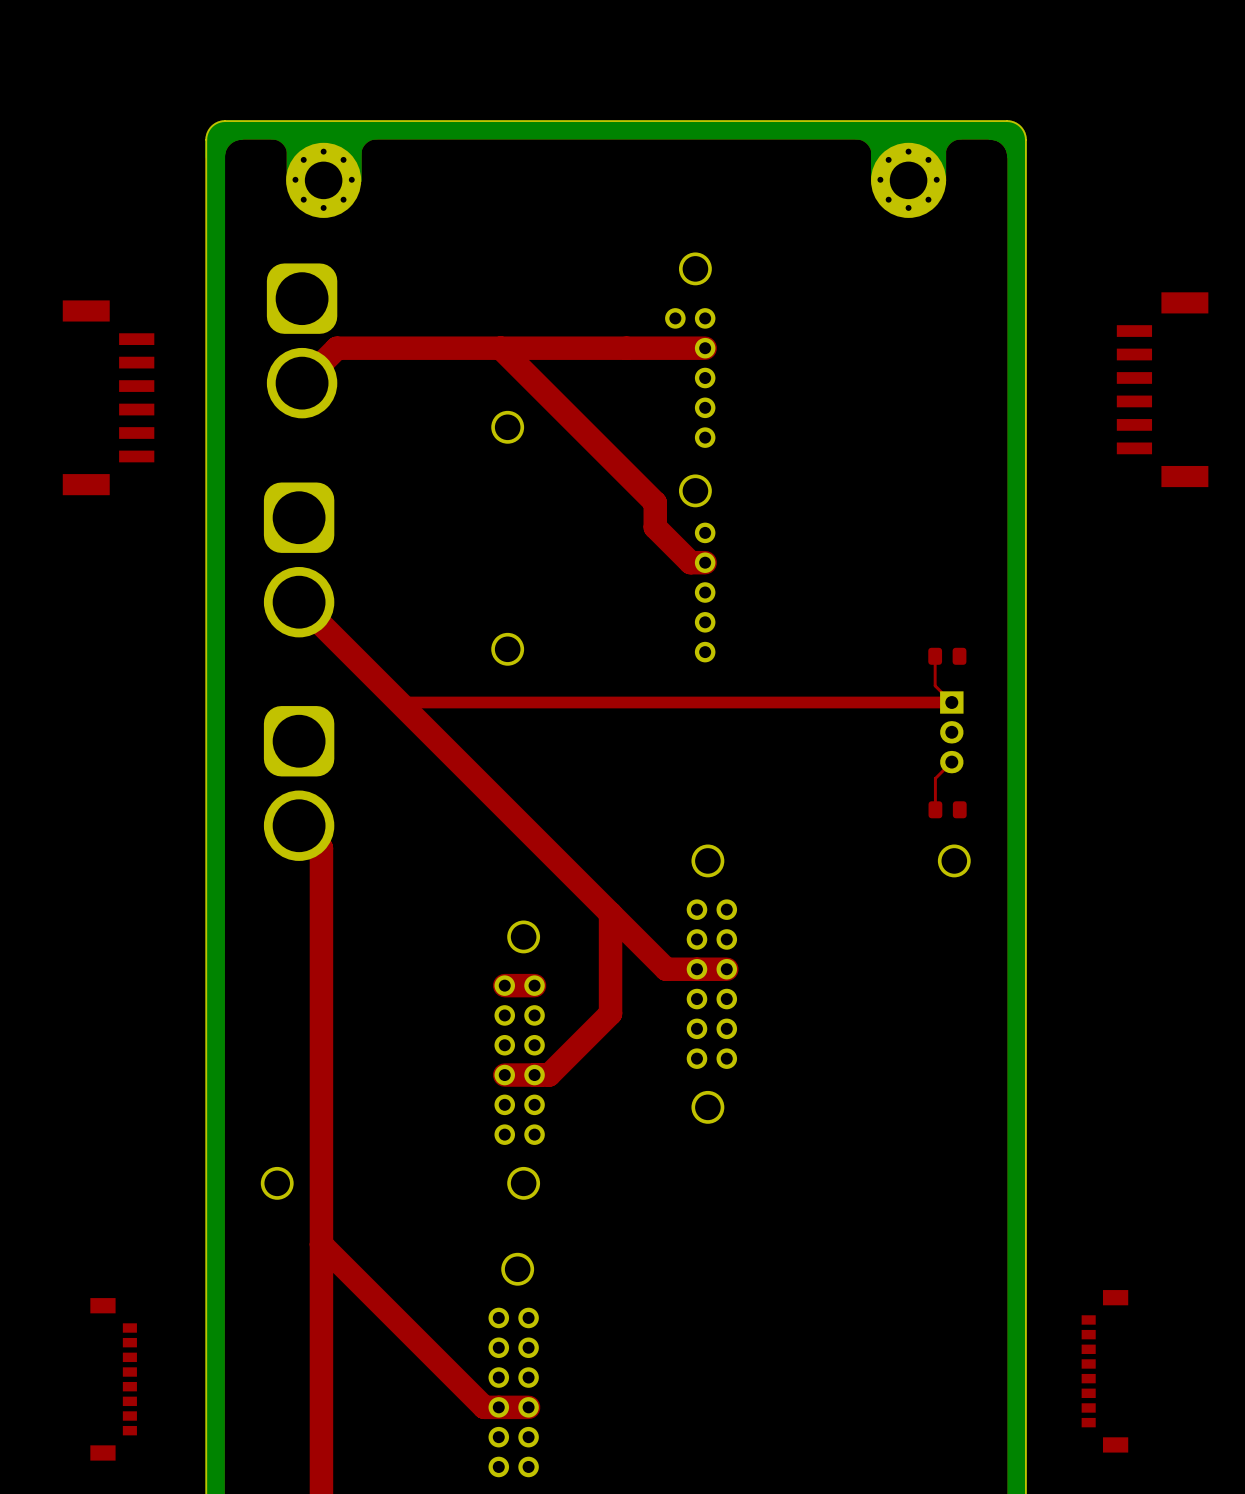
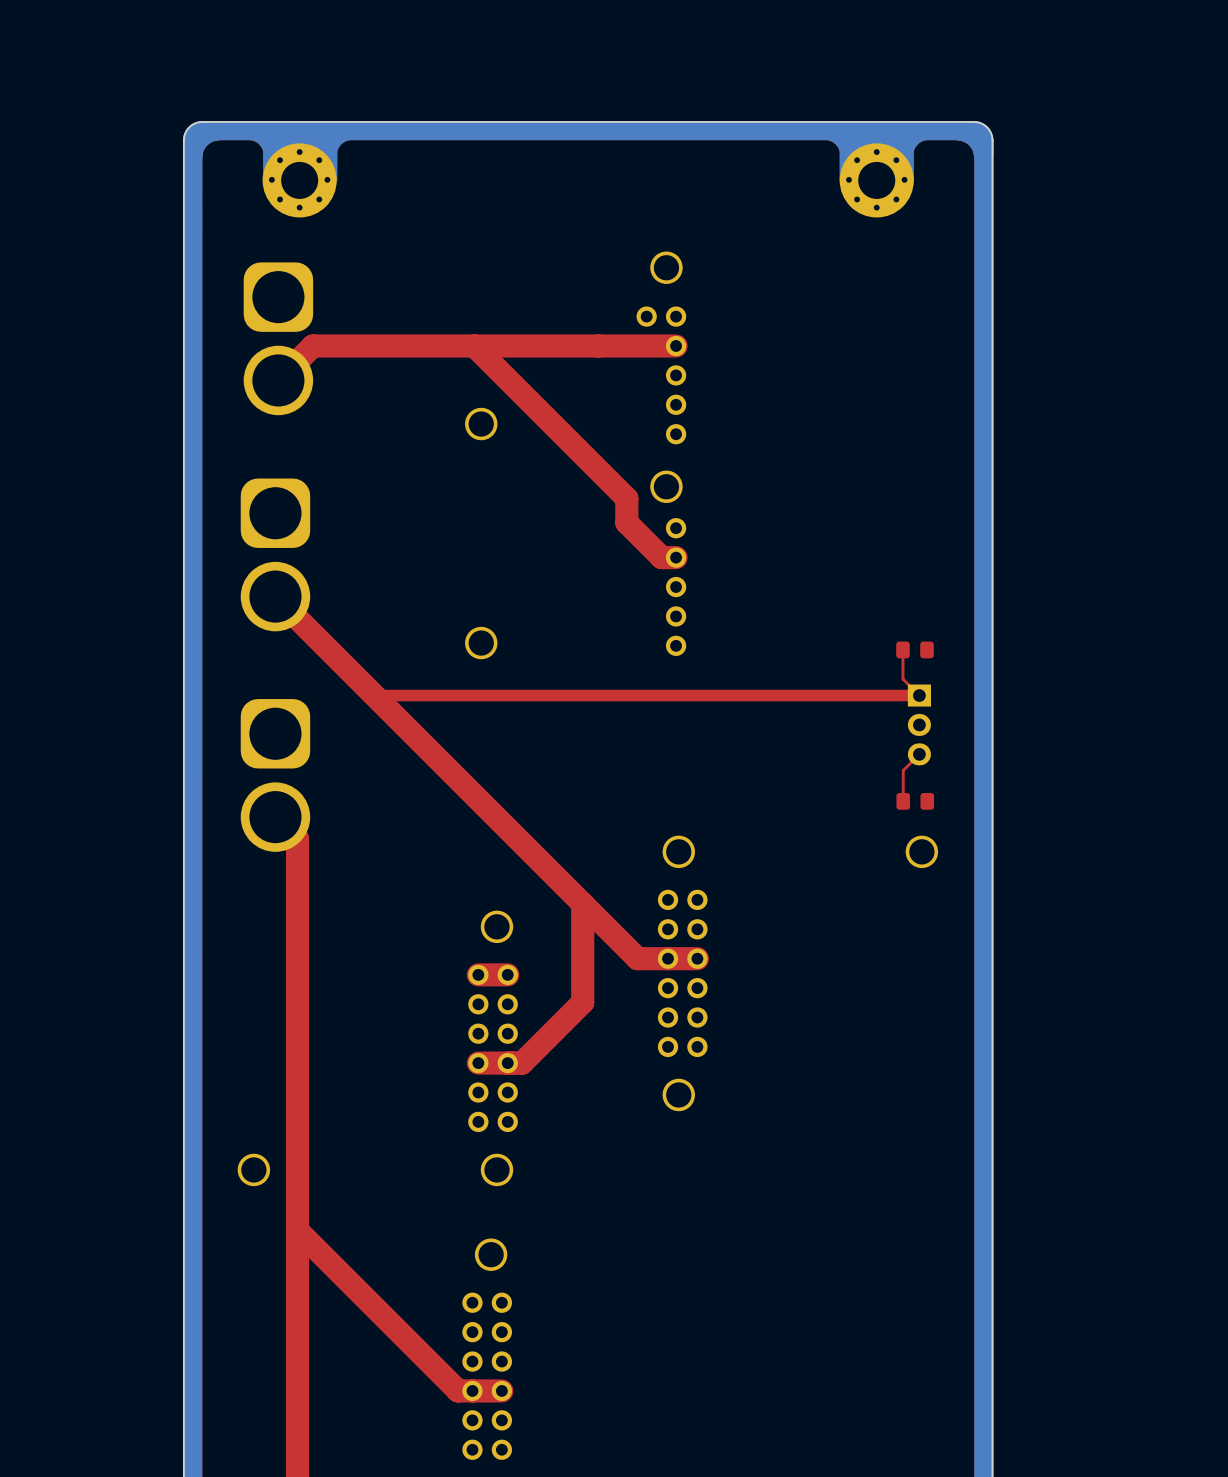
part: (1162, 389) -> none
part: (108, 397) -> none
part: (1104, 1371) -> none
part: (113, 1379) -> none

